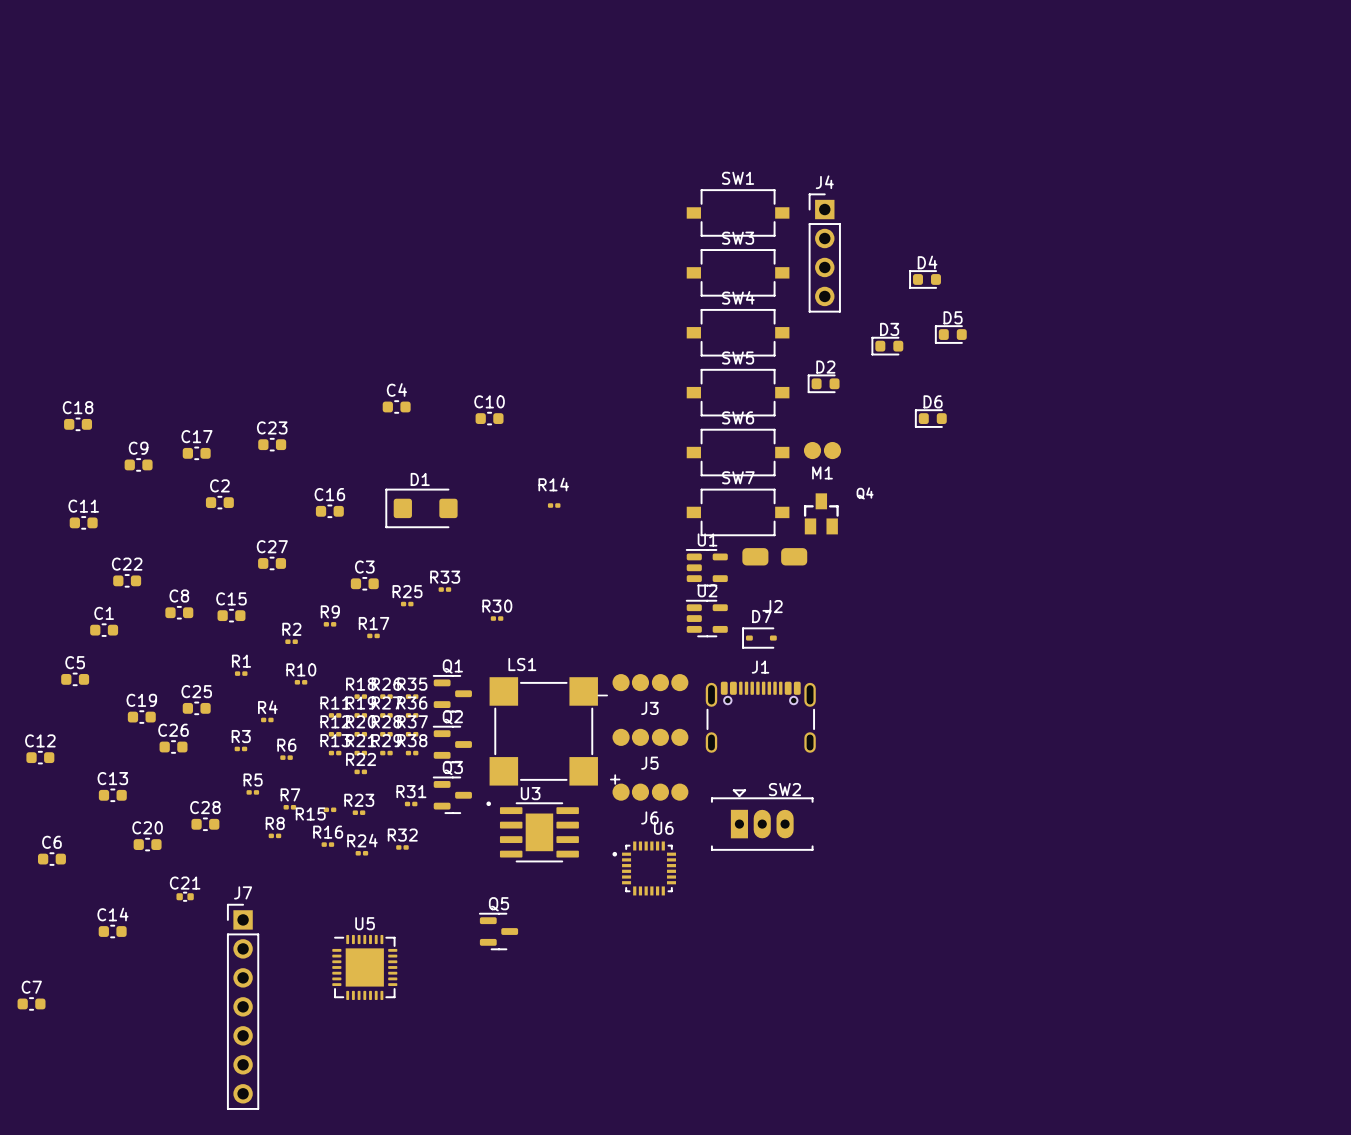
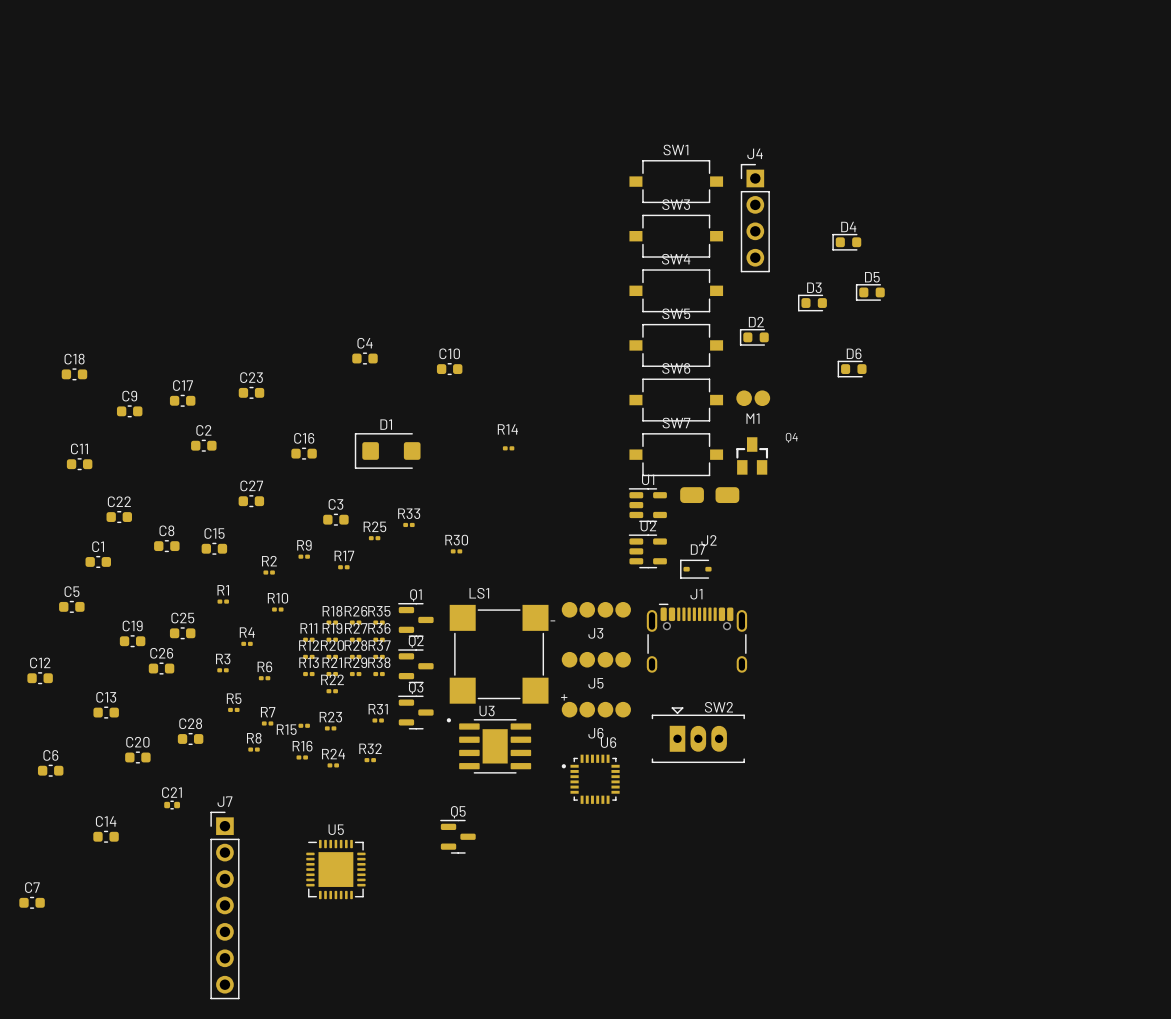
J1 footprint: [705, 681, 816, 753] -> [646, 603, 748, 673]

